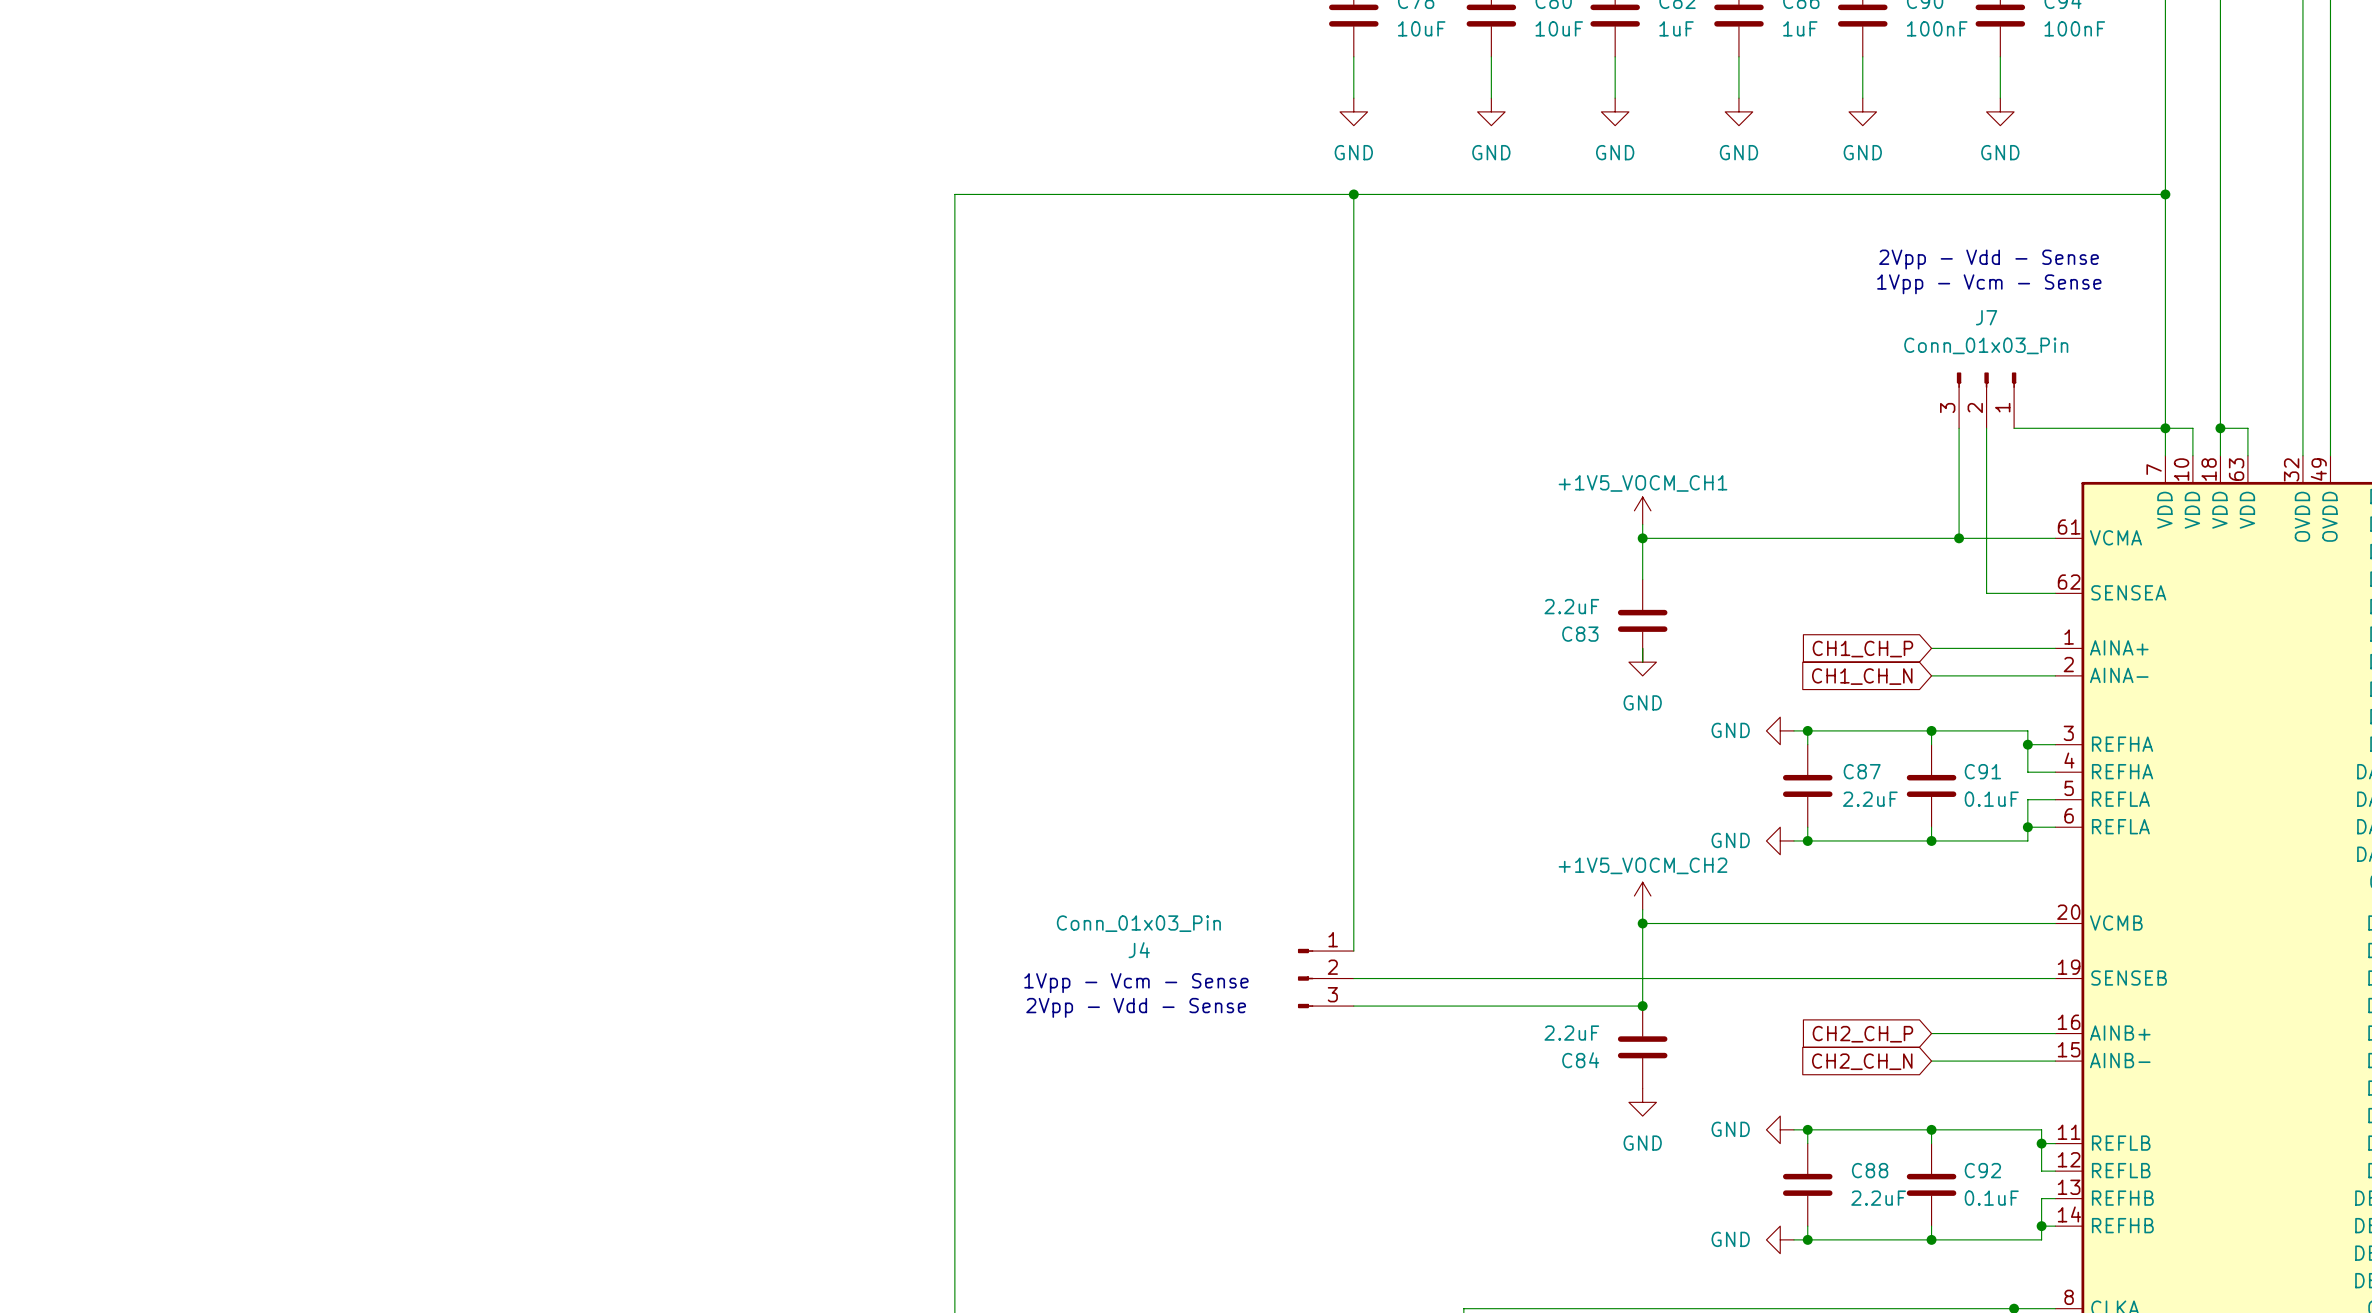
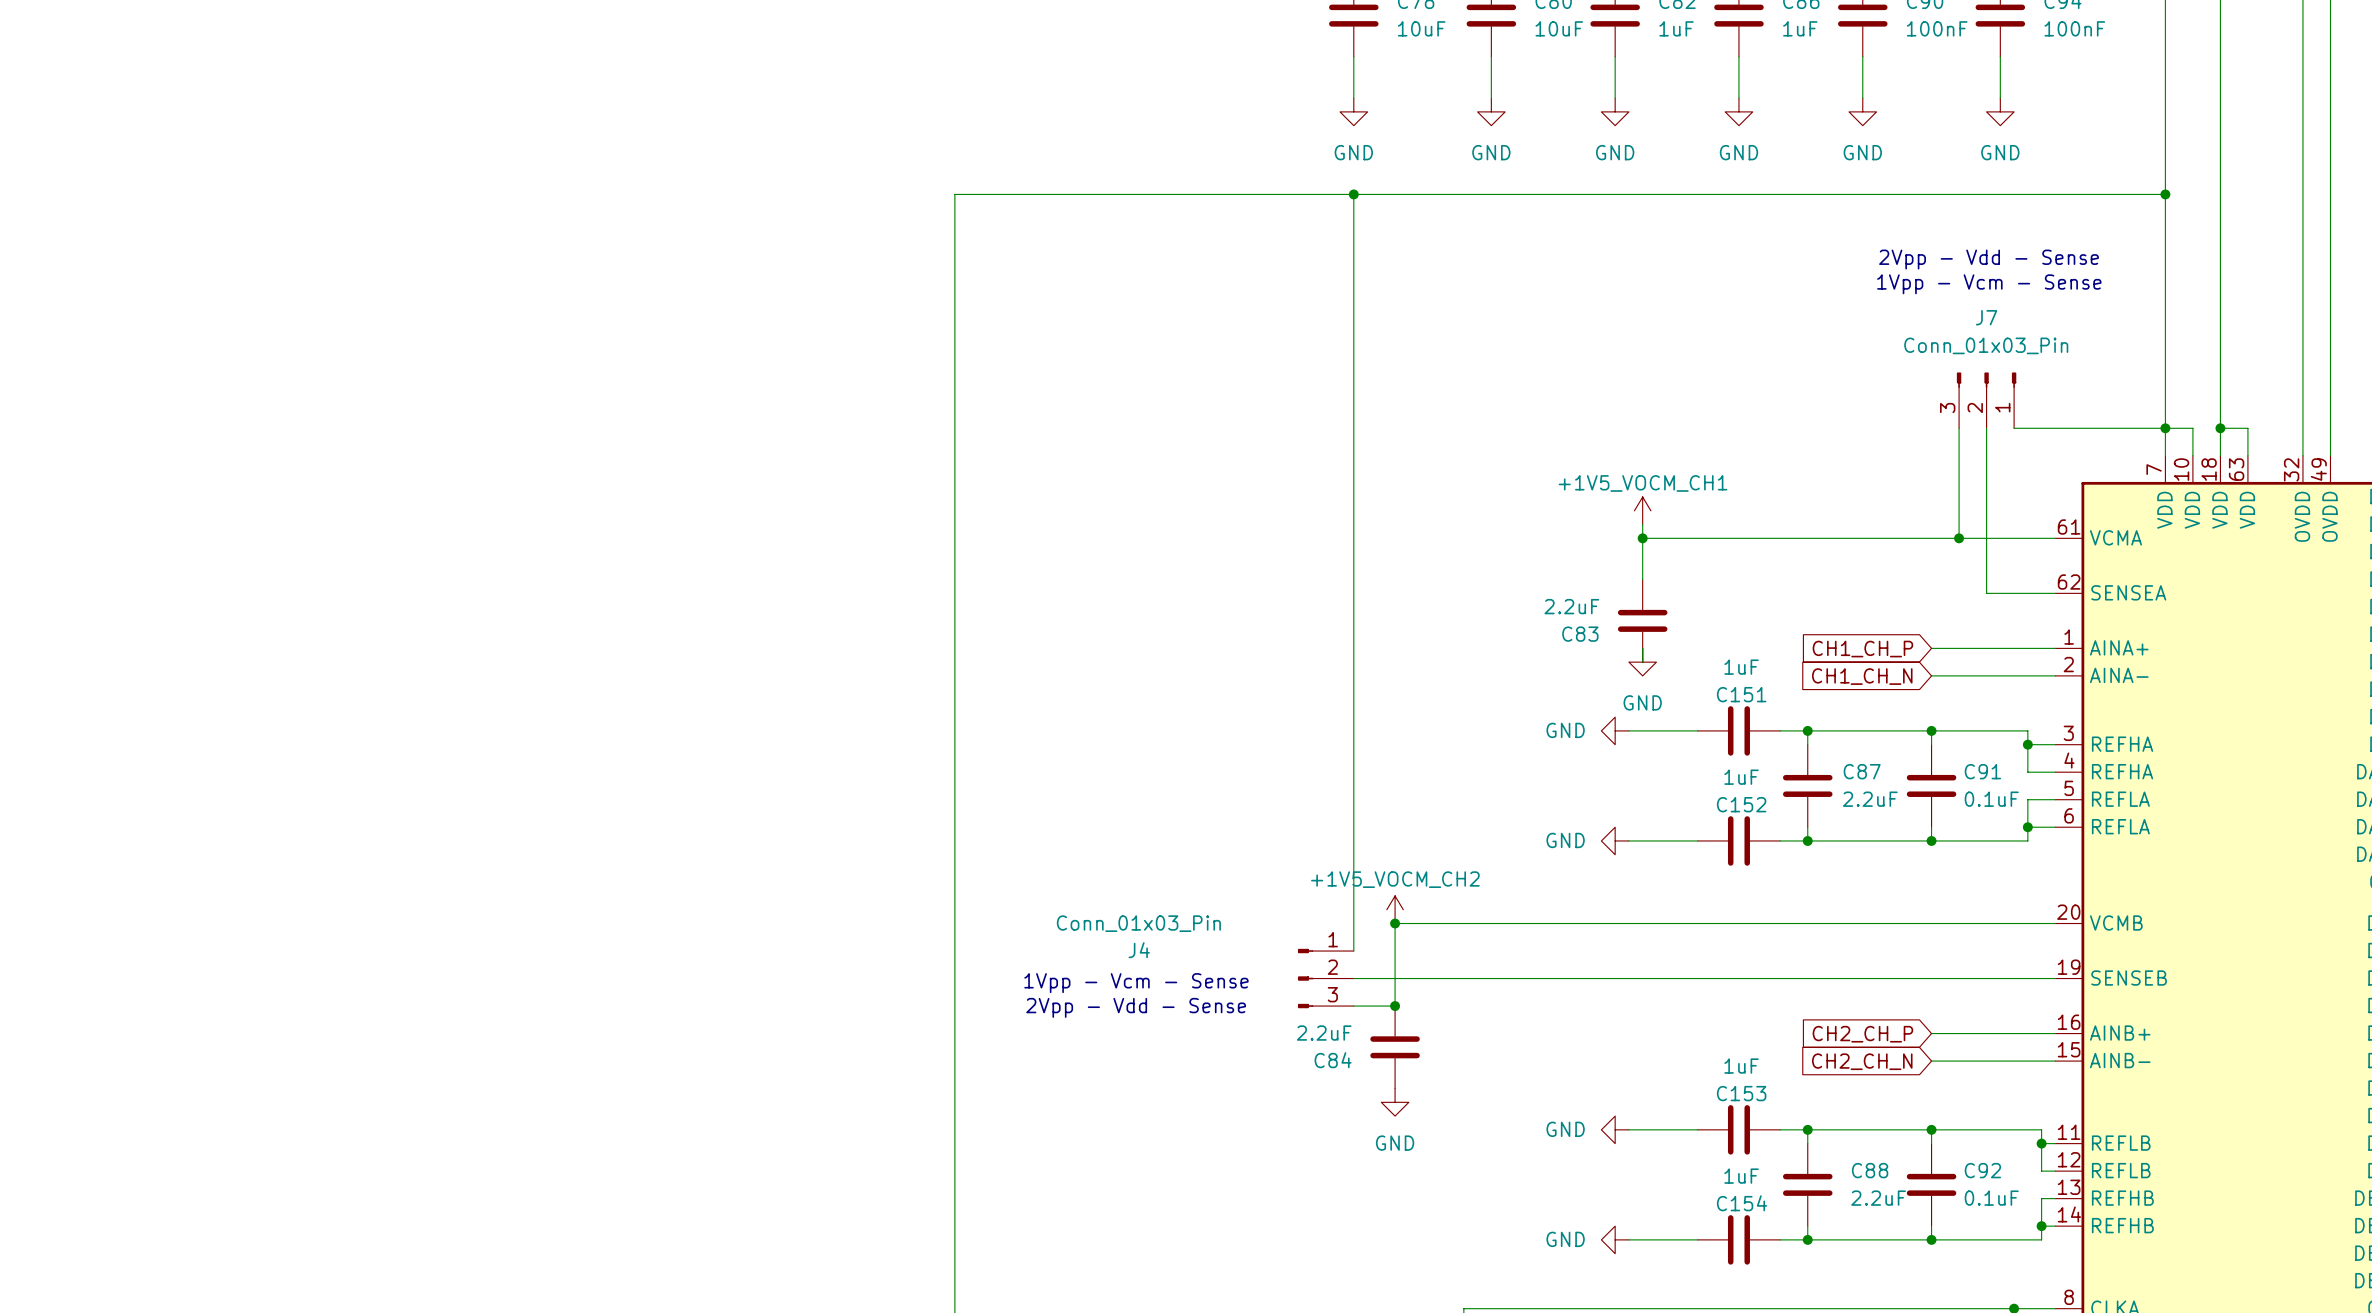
power symbol: none -> GND (1615, 730)
wire: none -> (1628, 730) (1697, 730)
C151: none -> 1uF (1738, 730)
power symbol: GND (1780, 730) -> none
power symbol: none -> GND (1615, 840)
wire: none -> (1628, 840) (1697, 840)
C152: none -> 1uF (1738, 840)
power symbol: GND (1780, 840) -> none
power symbol position: +1V5_VOCM_CH2 (1642, 896) -> +1V5_VOCM_CH2 (1395, 909)
wire: (1642, 909) (1642, 1006) (1395, 1006) -> (1642, 923) (1395, 923) (1395, 1006)
junction: none -> (1395, 923)
junction: (1642, 923) -> none
junction: none -> (1395, 1006)
junction: (1642, 1006) -> none
C84 position: (1642, 1047) -> (1395, 1047)
power symbol: none -> GND (1395, 1102)
power symbol rotation: 0° (1642, 1102) -> 90° clockwise (1615, 1129)
power symbol position: GND (1642, 1102) -> GND (1615, 1129)
wire: none -> (1628, 1129) (1697, 1129)
C153: none -> 1uF (1738, 1129)
power symbol: GND (1780, 1129) -> none
power symbol: none -> GND (1615, 1239)
wire: none -> (1628, 1239) (1697, 1239)
C154: none -> 1uF (1738, 1239)
power symbol: GND (1780, 1239) -> none

